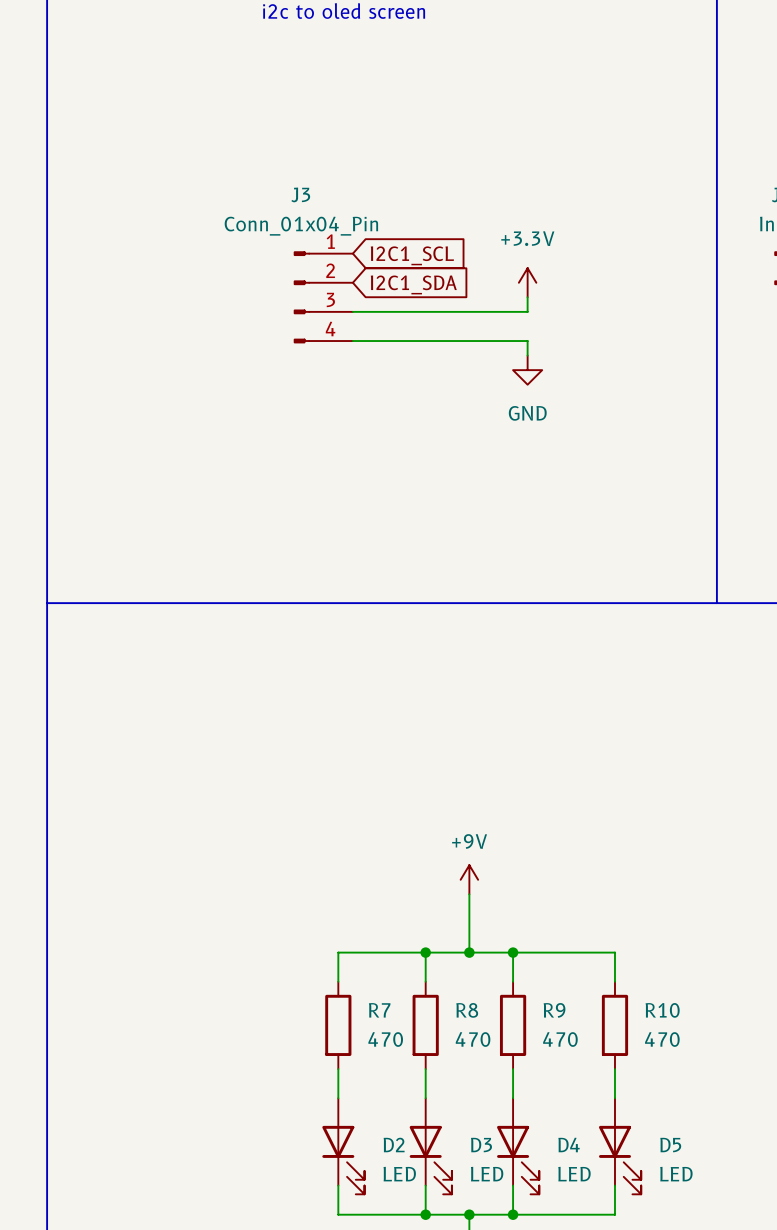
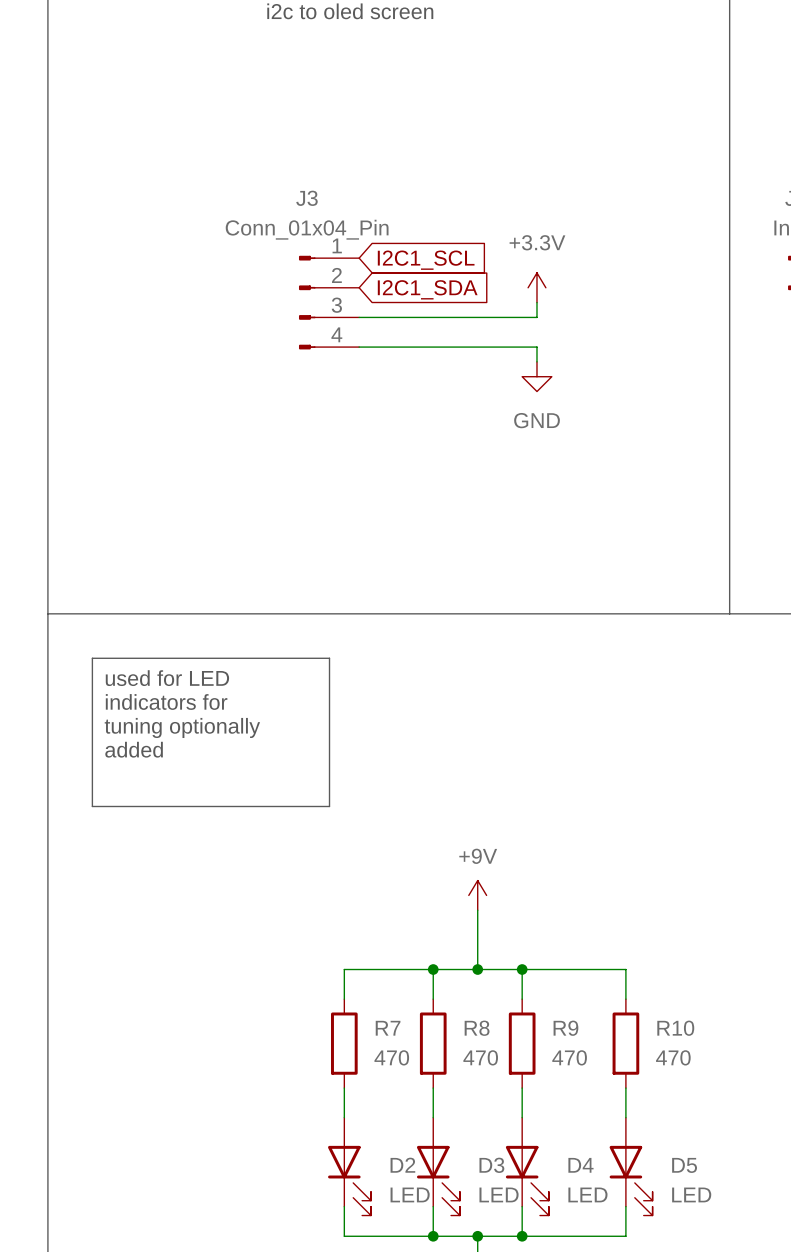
line: none -> (92, 658) (329, 658) (329, 806) (92, 806) (92, 658)
text: none -> used for LED (167, 678)
text: none -> indicators for (166, 701)
text: none -> tuning optionally (182, 727)
text: none -> added (134, 749)

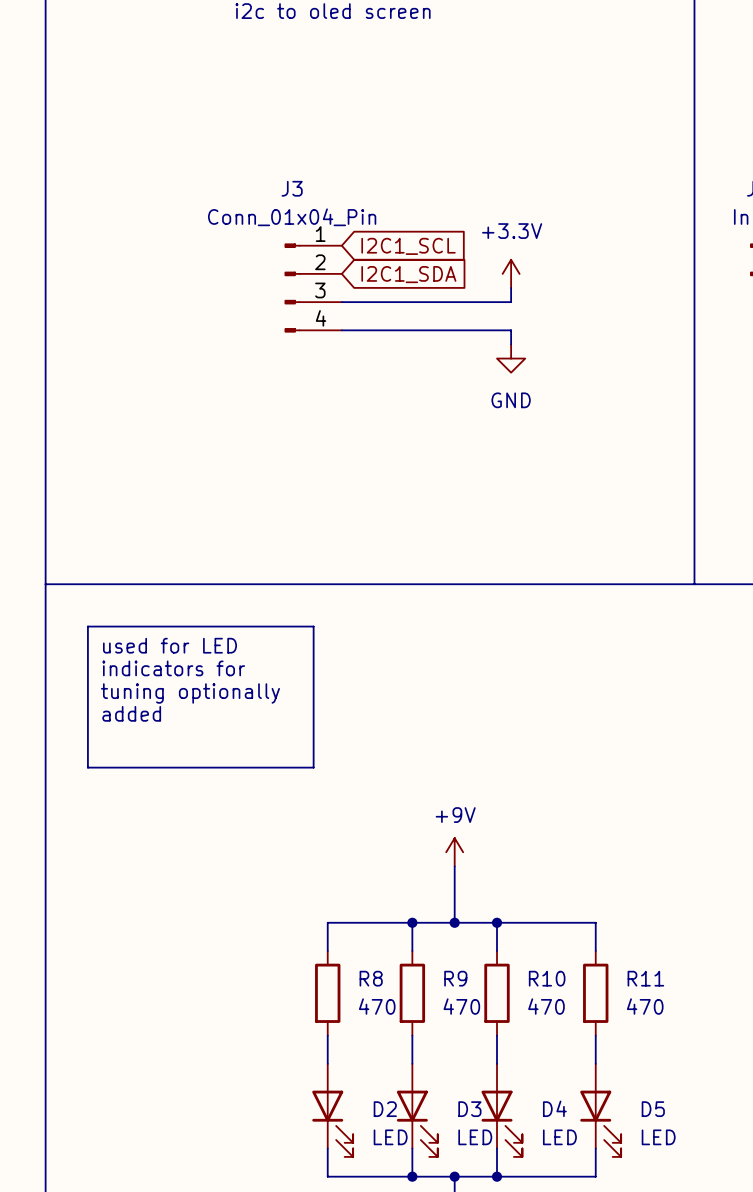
R7 name: R7 (388, 1028) -> R8 (371, 978)
R8 name: R8 (477, 1028) -> R9 (455, 978)
R9 name: R9 (565, 1028) -> R10 (547, 978)
R10 name: R10 (675, 1028) -> R11 (645, 978)

